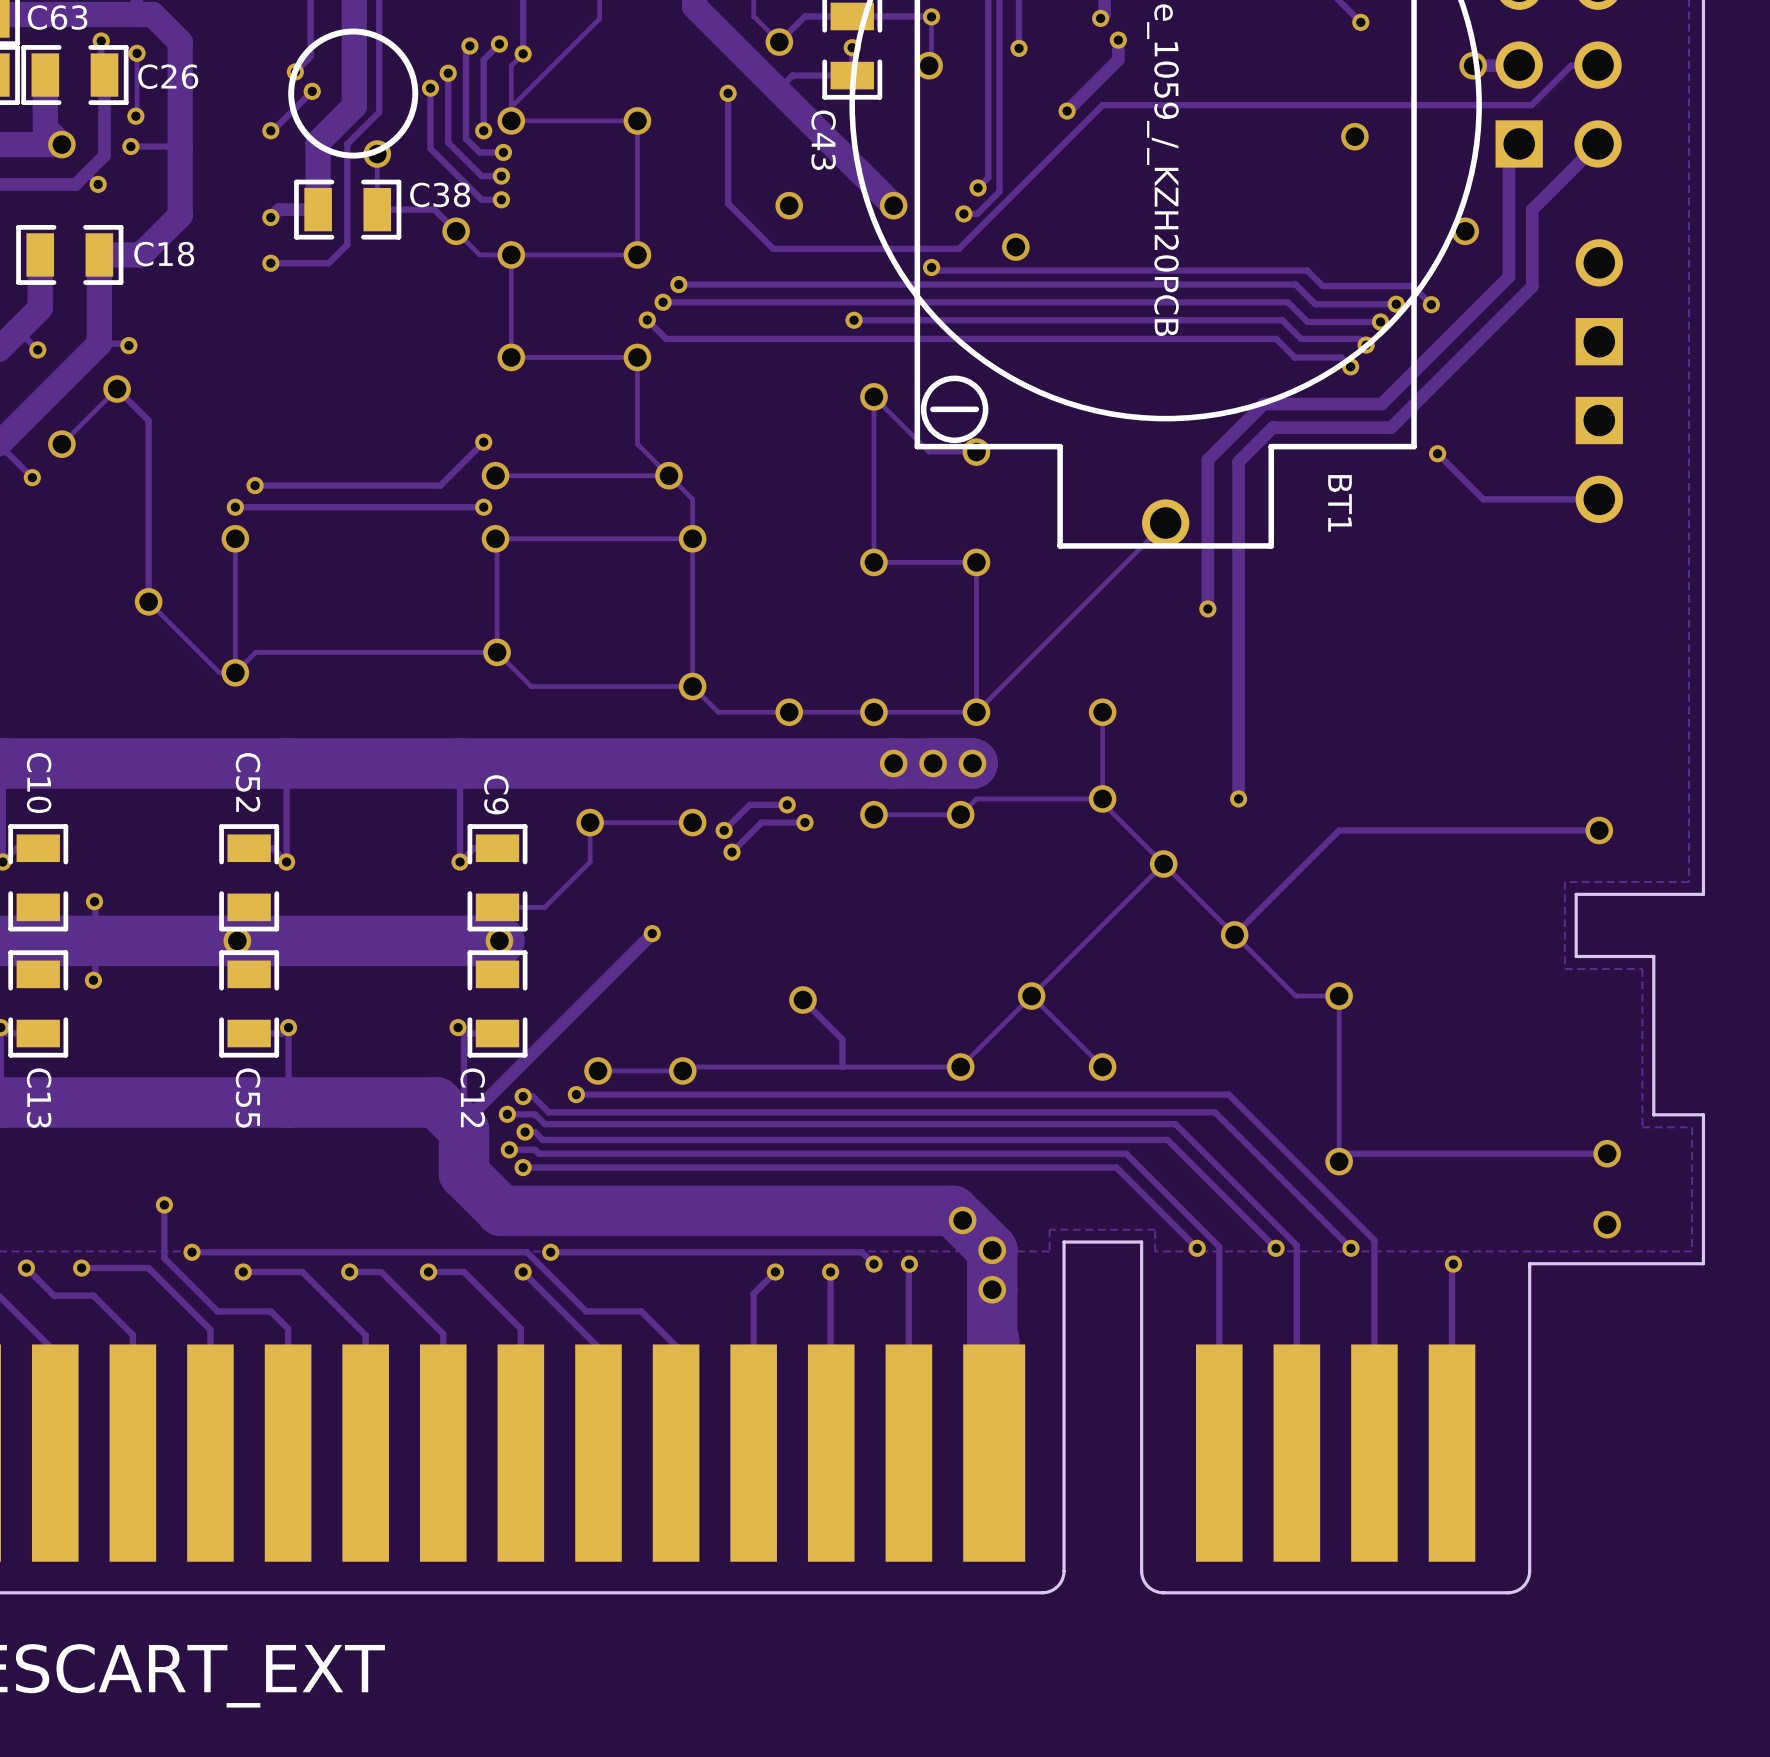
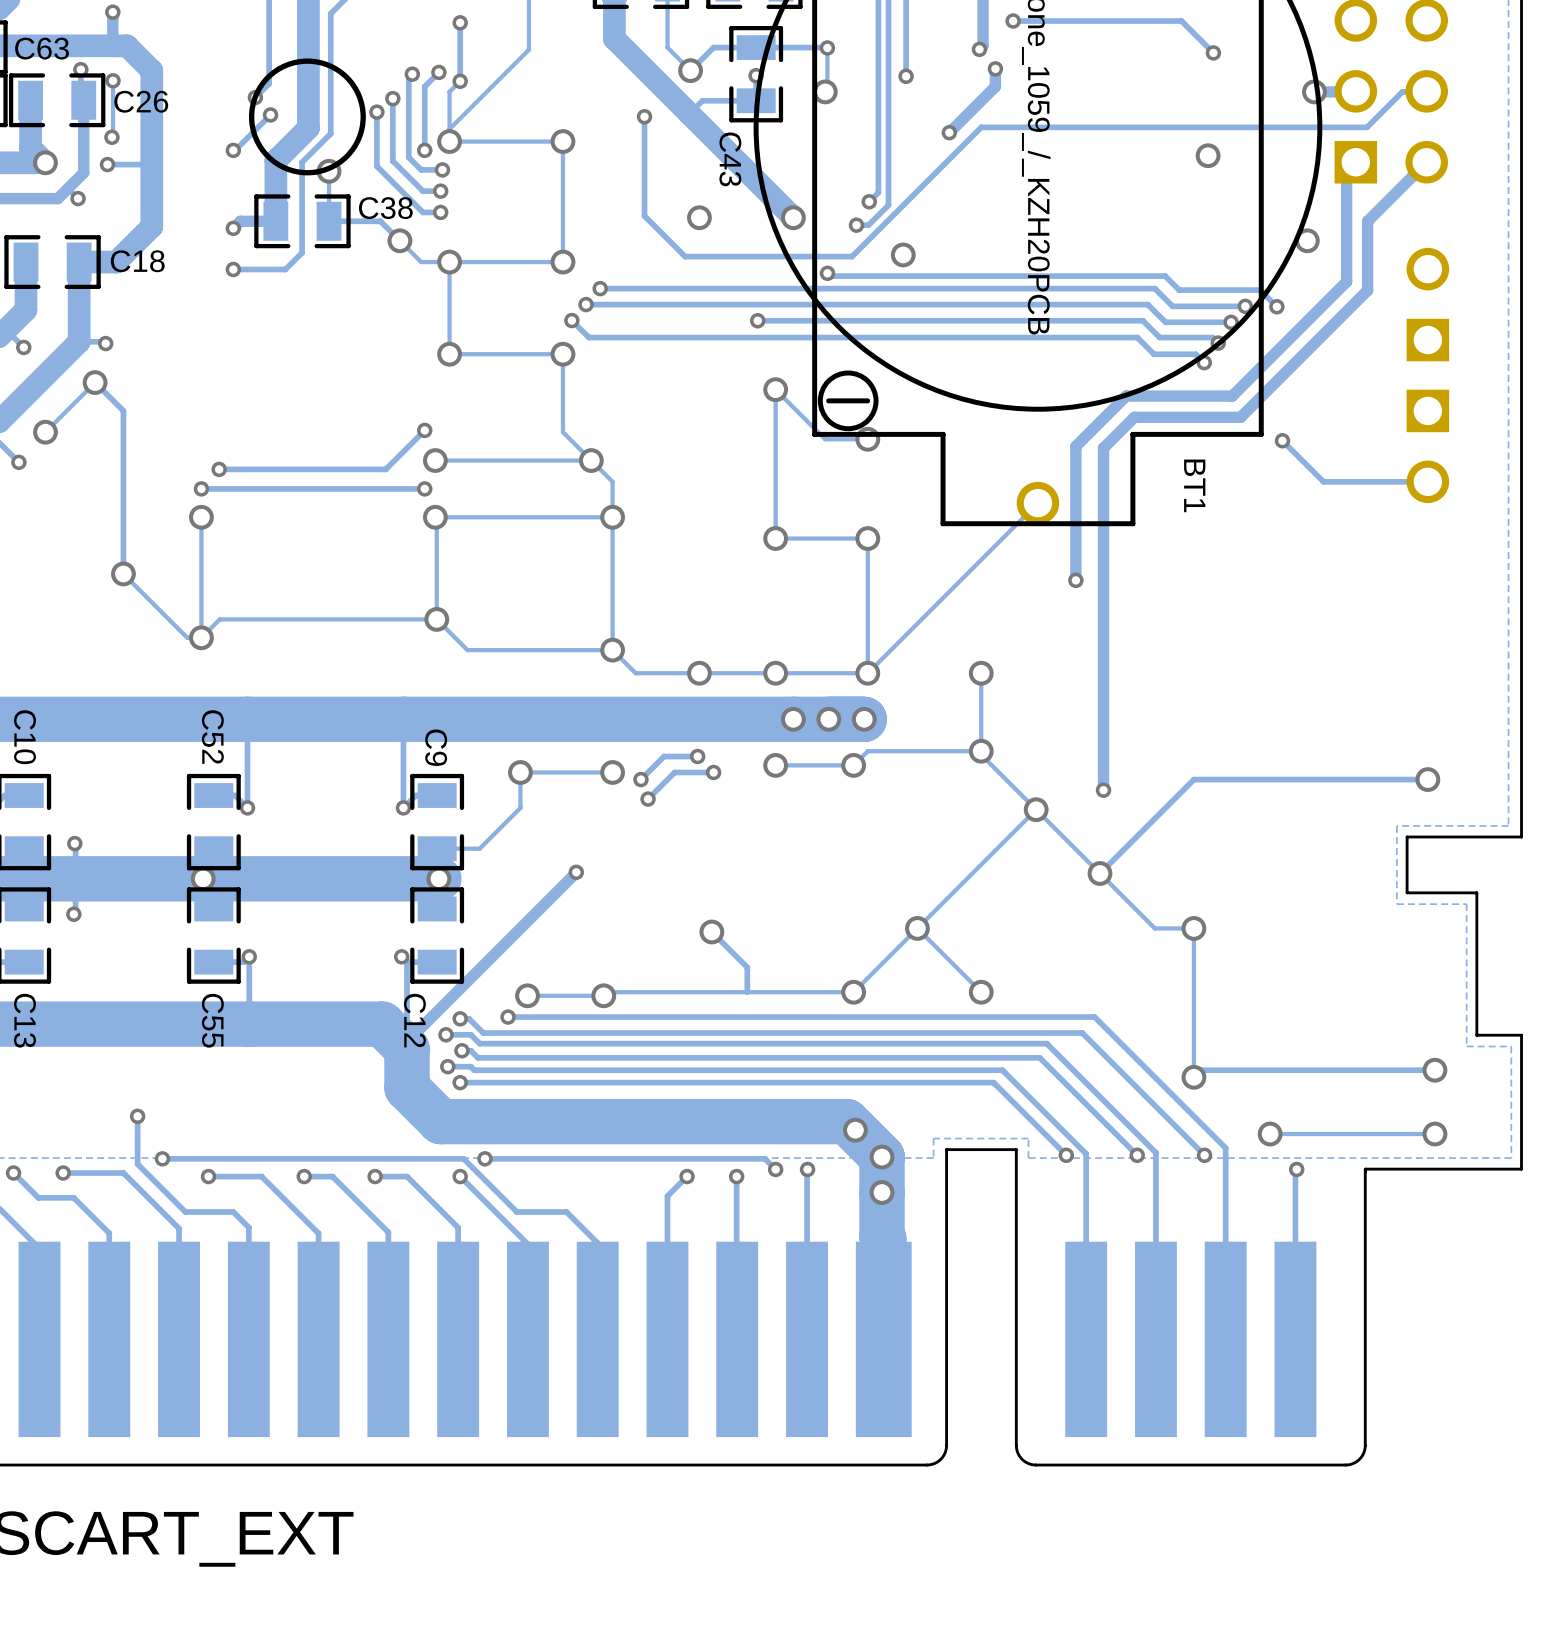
track: none -> (1103, 751) (1103, 790)
via position: (1238, 798) -> (1103, 790)
via: none -> (1270, 1134)
track: none -> (1434, 1134) (1270, 1134)

